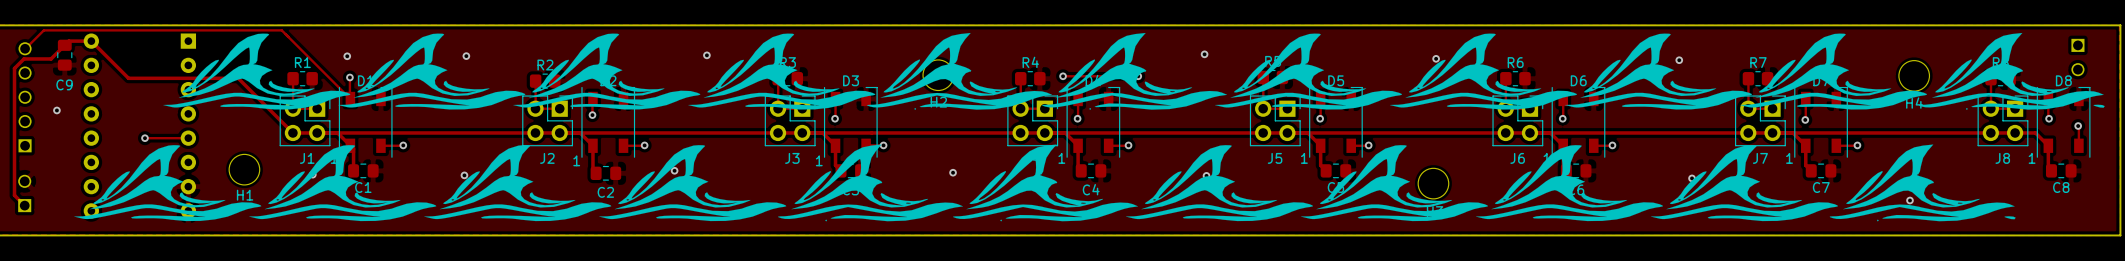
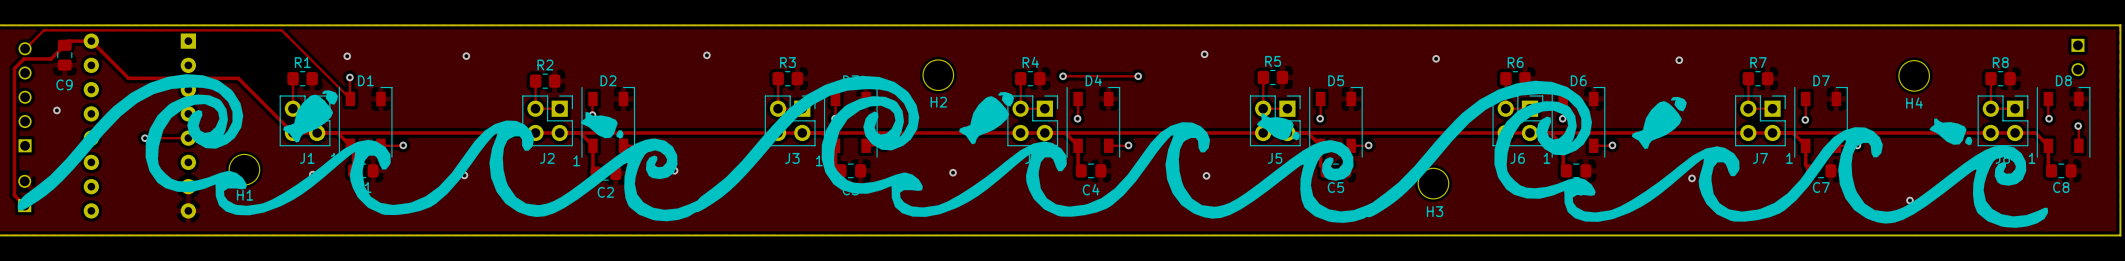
drawing: [163, 32, 2105, 110] -> none
drawing: none -> [17, 74, 2049, 228]
drawing: [74, 144, 2016, 222] -> none

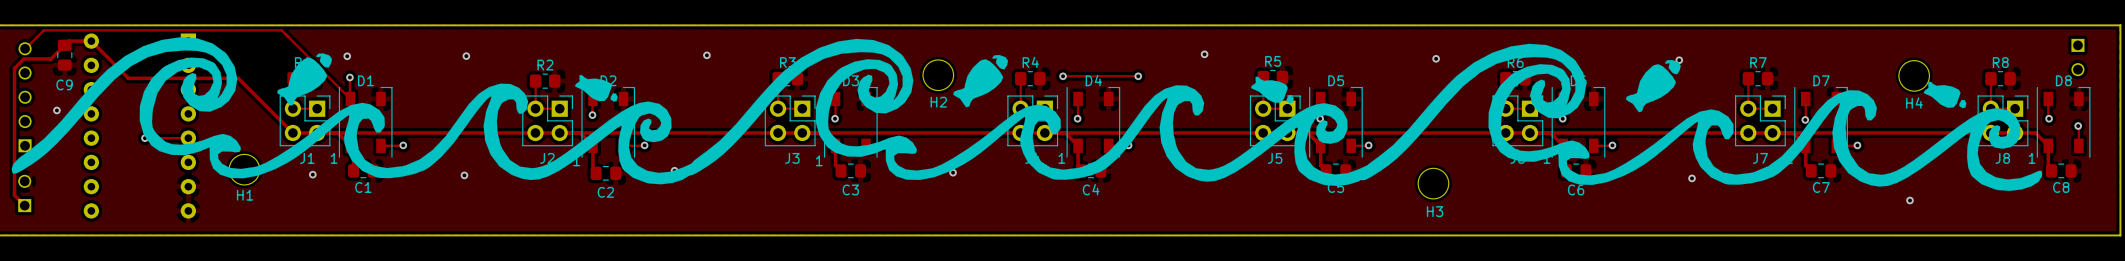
drawing position: (358, 147) -> (352, 110)
drawing position: (1034, 149) -> (1028, 112)
drawing position: (1707, 154) -> (1701, 117)

